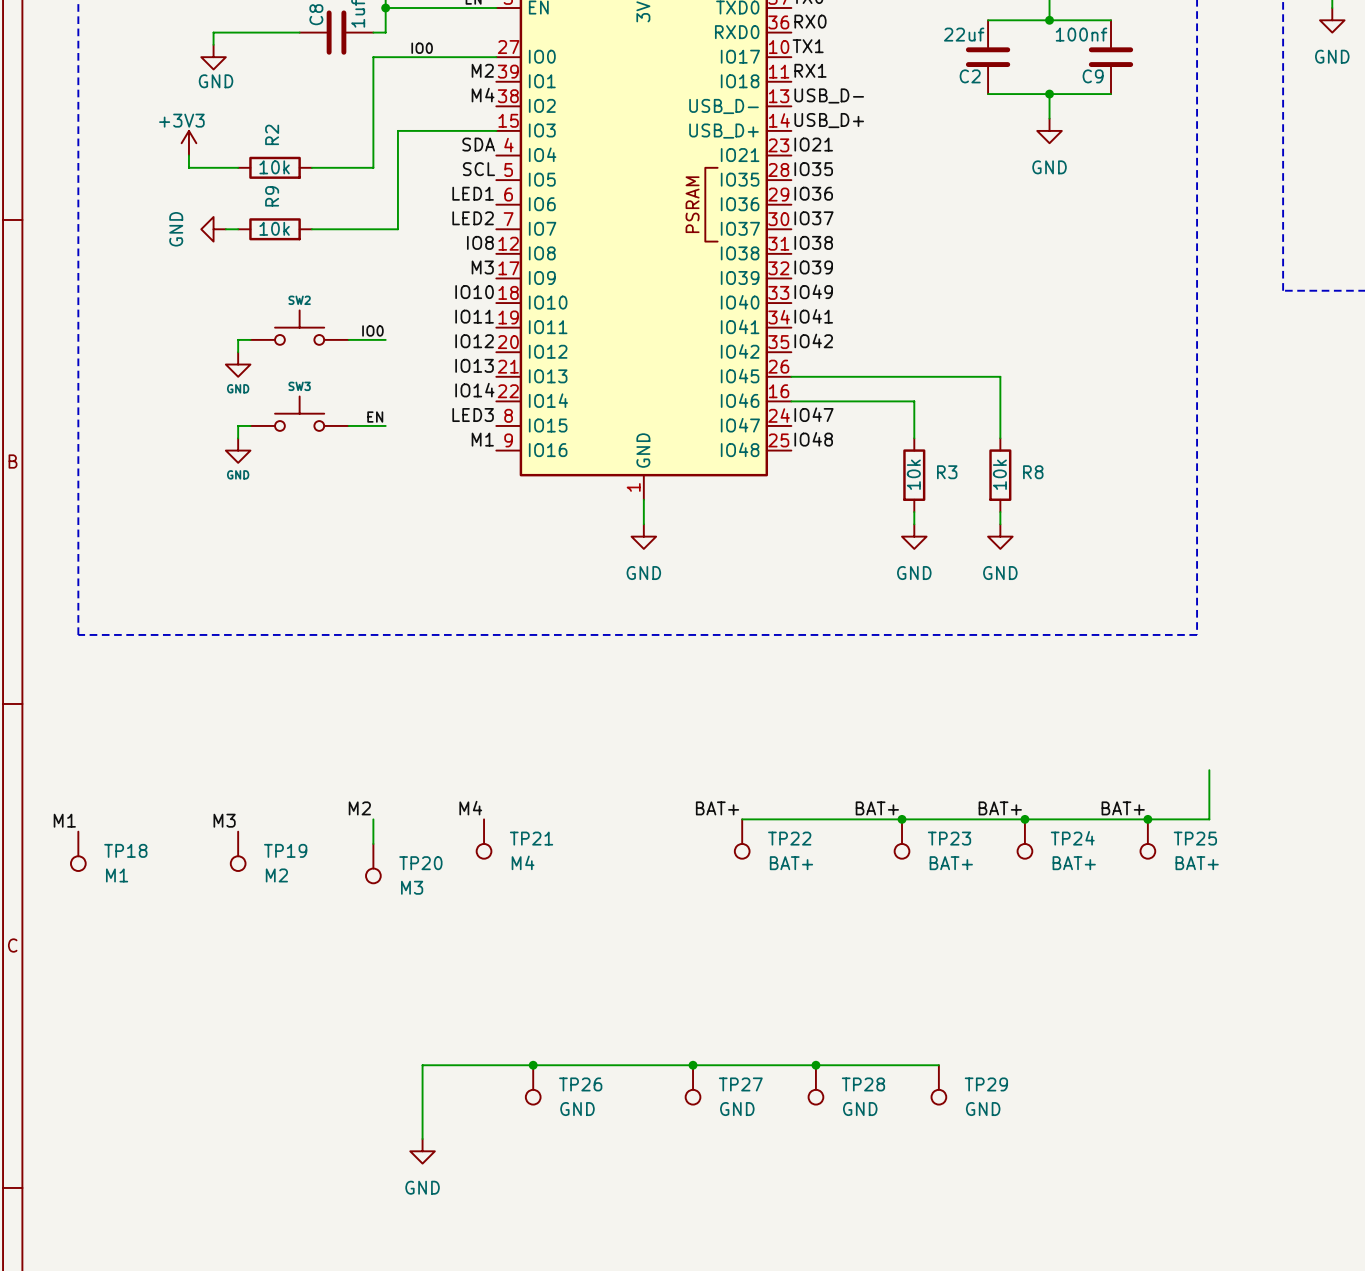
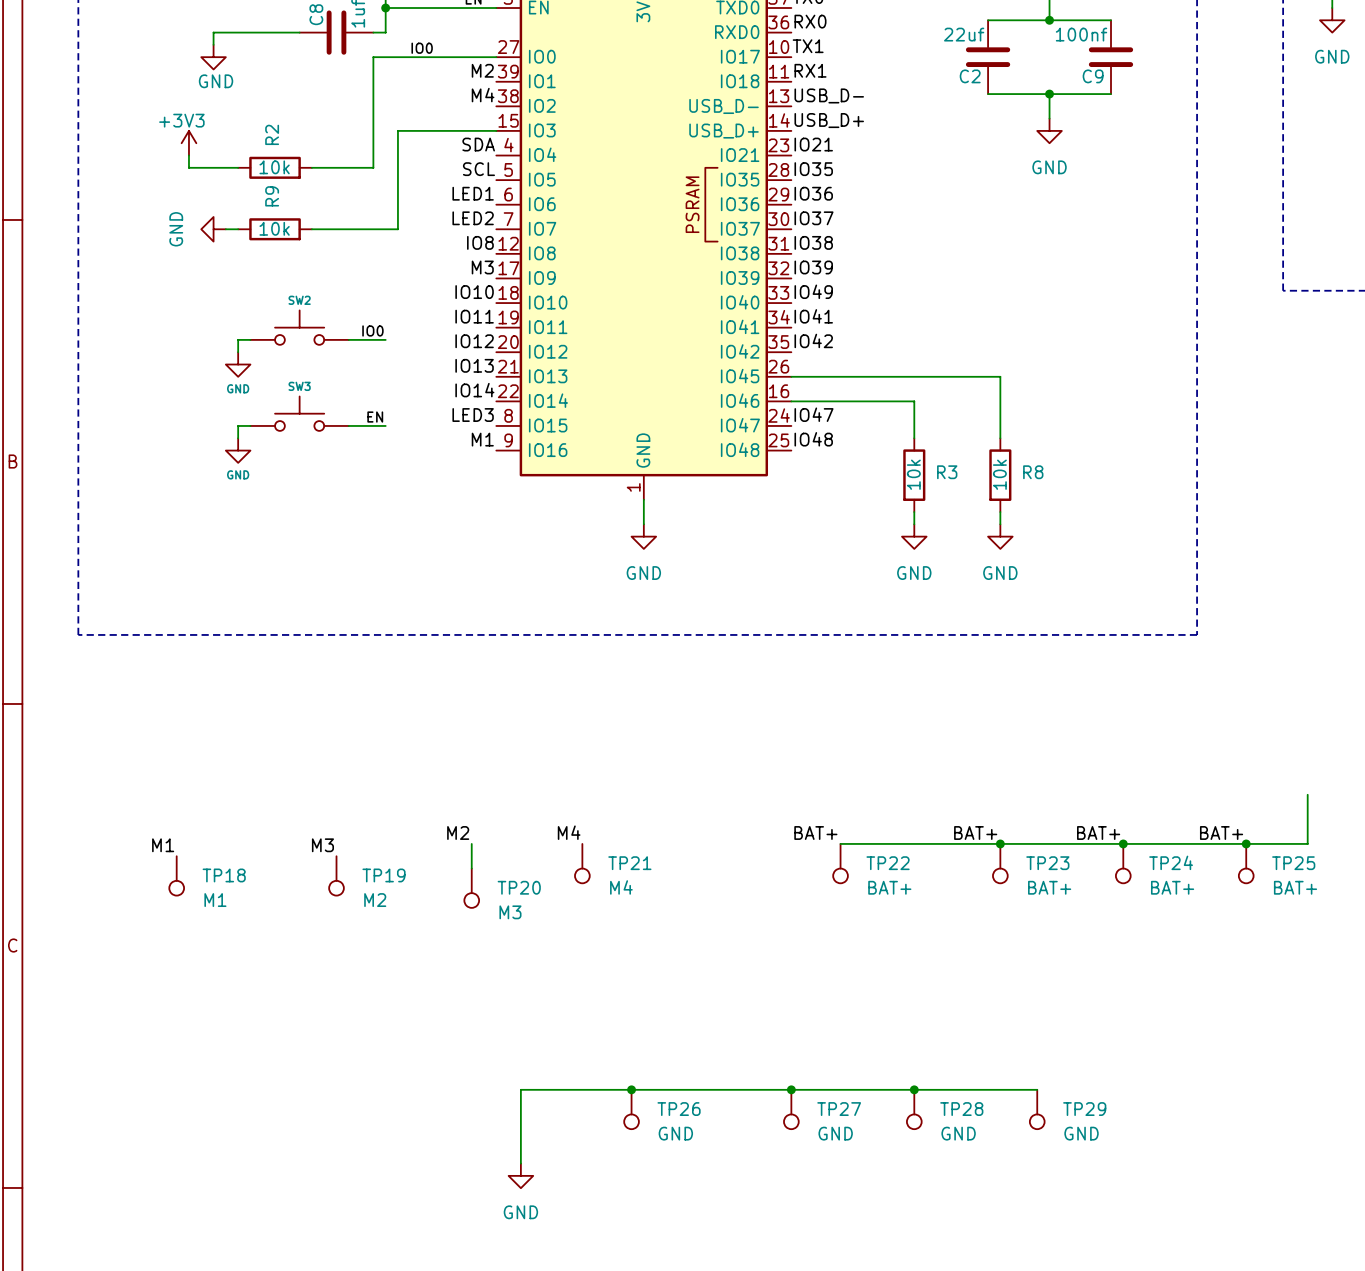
wire: (1209, 770) (1209, 819) (742, 819) -> (1307, 794) (1307, 843) (840, 843)
label position: M2 (359, 808) -> M2 (458, 832)
label position: M4 (470, 808) -> M4 (569, 832)
label: BAT+ (717, 808) -> none
label: BAT+ (877, 808) -> none
label position: BAT+ (1000, 808) -> BAT+ (975, 832)
label position: BAT+ (1123, 808) -> BAT+ (1098, 832)
wire: (373, 819) (373, 843) -> (471, 843) (471, 868)
junction: (902, 819) -> none
junction position: (1024, 819) -> (1000, 843)
junction position: (1147, 819) -> (1123, 843)
label position: M1 (64, 820) -> M1 (163, 845)
label position: M3 (224, 820) -> M3 (322, 845)
label: none -> BAT+ (815, 832)
label: none -> BAT+ (1221, 832)
TP21 position: (484, 839) -> (582, 863)
TP22 position: (742, 839) -> (840, 863)
TP23 position: (902, 839) -> (1000, 863)
TP24 position: (1024, 839) -> (1123, 863)
TP25 position: (1147, 839) -> (1246, 863)
junction: none -> (1246, 843)
TP18 position: (78, 851) -> (176, 875)
TP19 position: (238, 851) -> (336, 875)
TP20 position: (373, 863) -> (471, 888)
junction: (533, 1065) -> none
junction: (693, 1065) -> none
junction position: (815, 1065) -> (791, 1089)
wire: (938, 1065) (422, 1065) (422, 1139) -> (1037, 1089) (520, 1089) (520, 1163)
TP26 position: (533, 1084) -> (631, 1109)
TP27 position: (693, 1084) -> (791, 1109)
TP28 position: (815, 1084) -> (914, 1109)
TP29 position: (938, 1084) -> (1037, 1109)
junction: none -> (631, 1089)
junction: none -> (914, 1089)
power symbol position: GND (422, 1151) -> GND (520, 1175)

